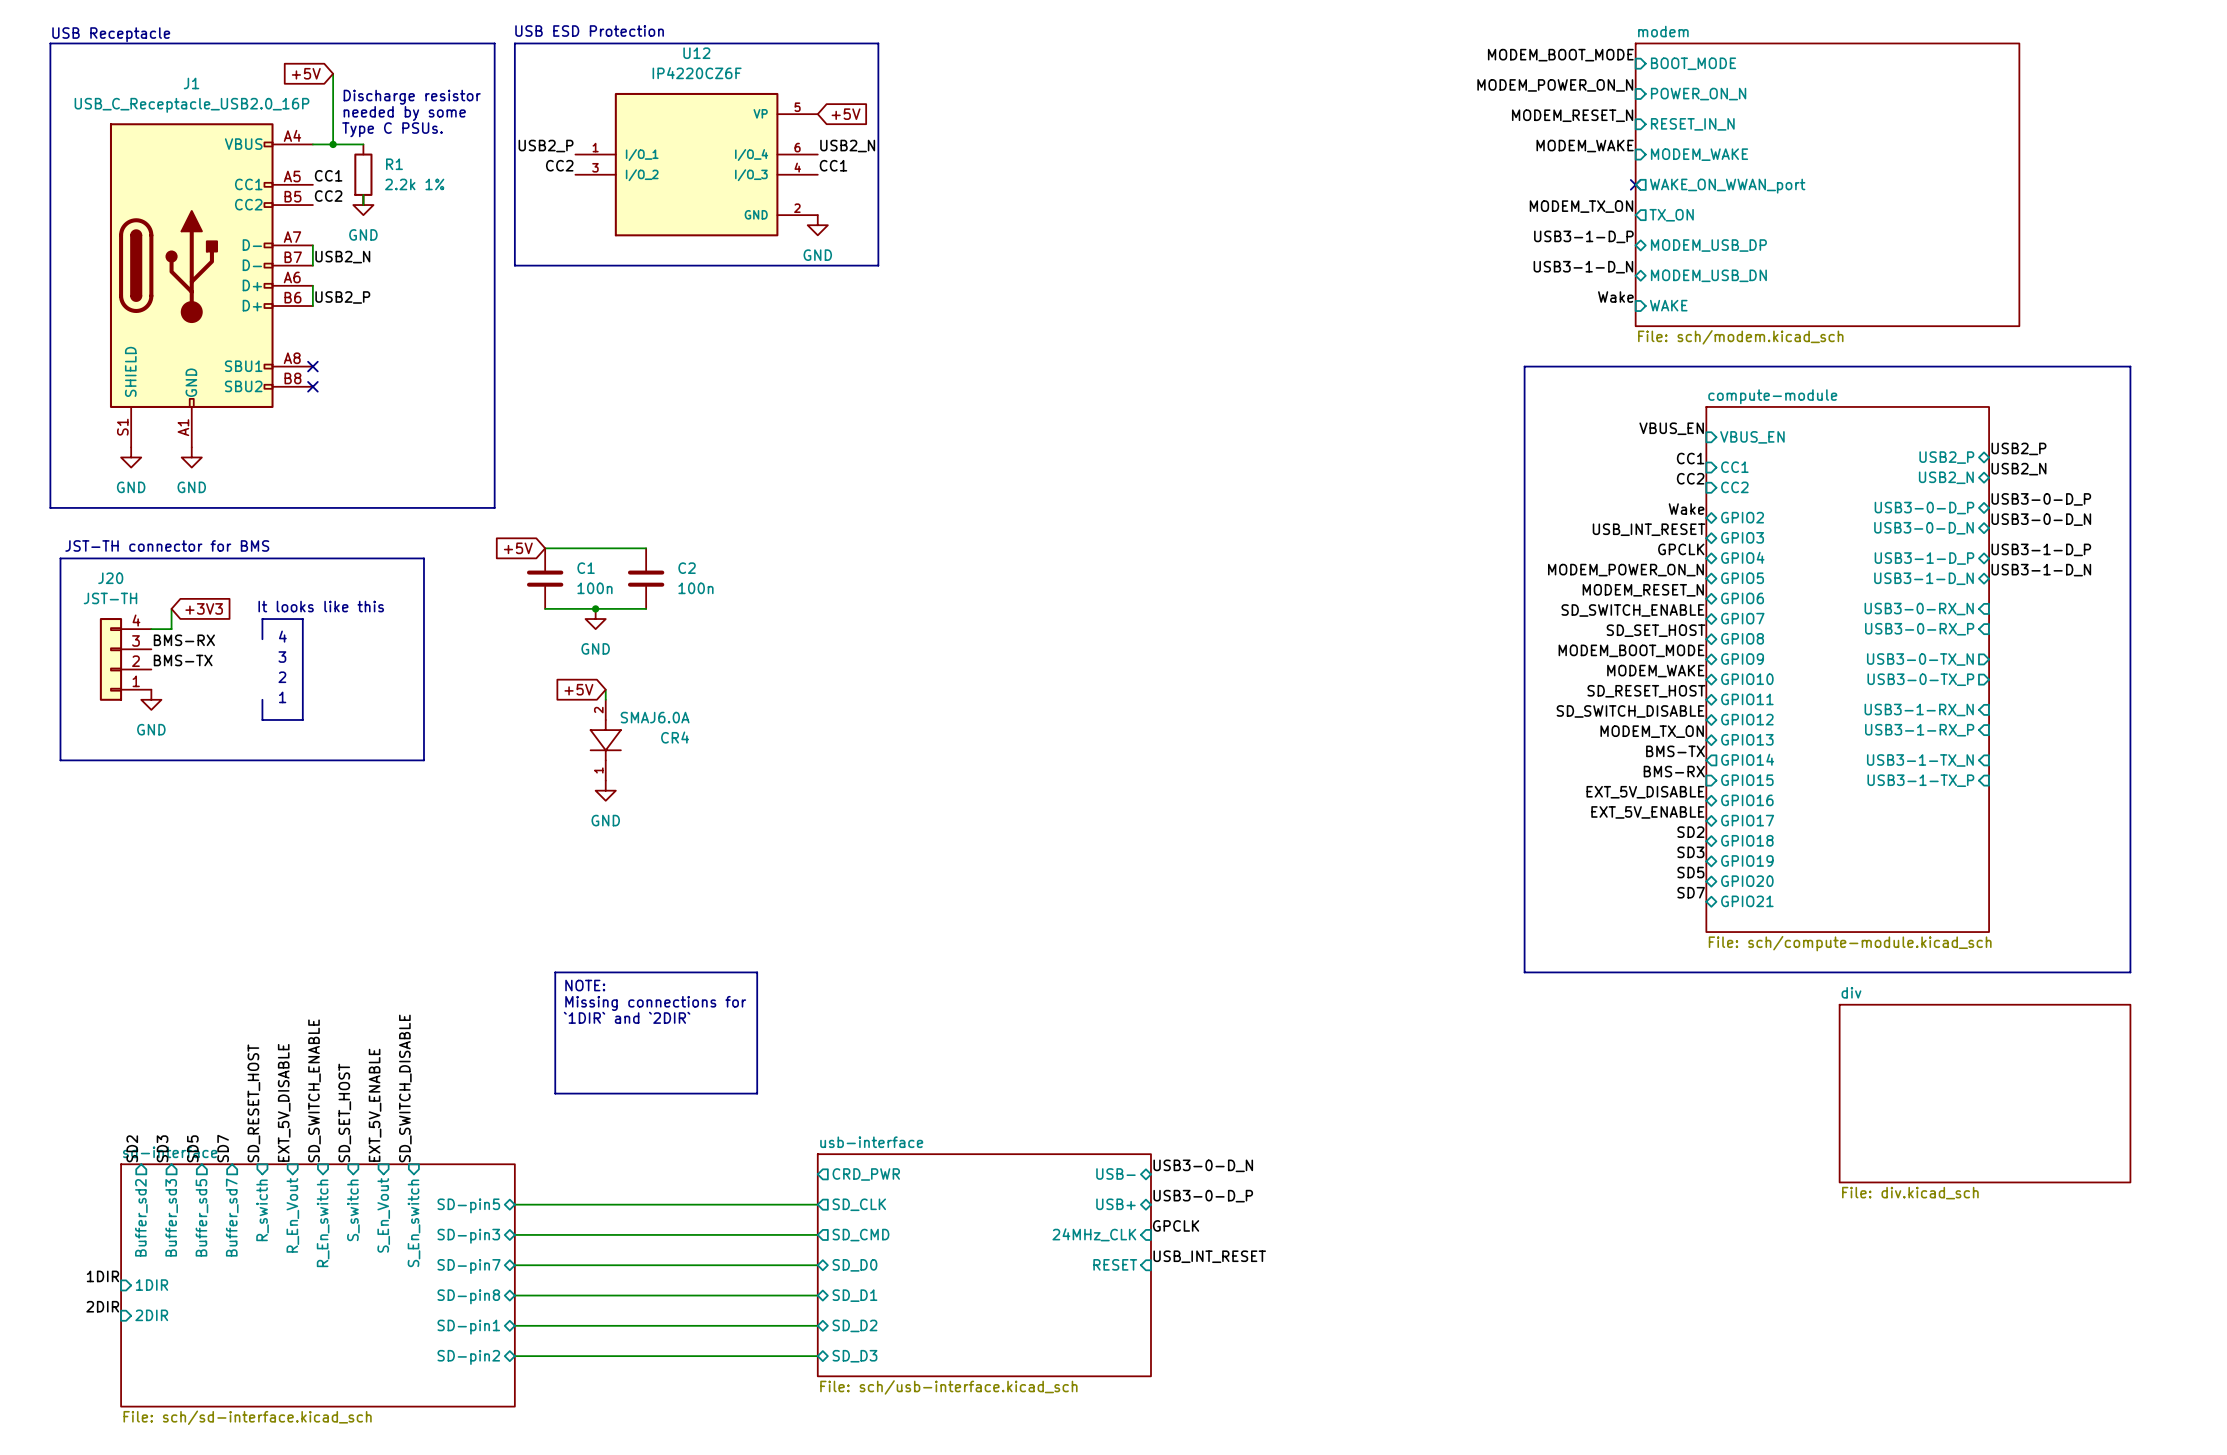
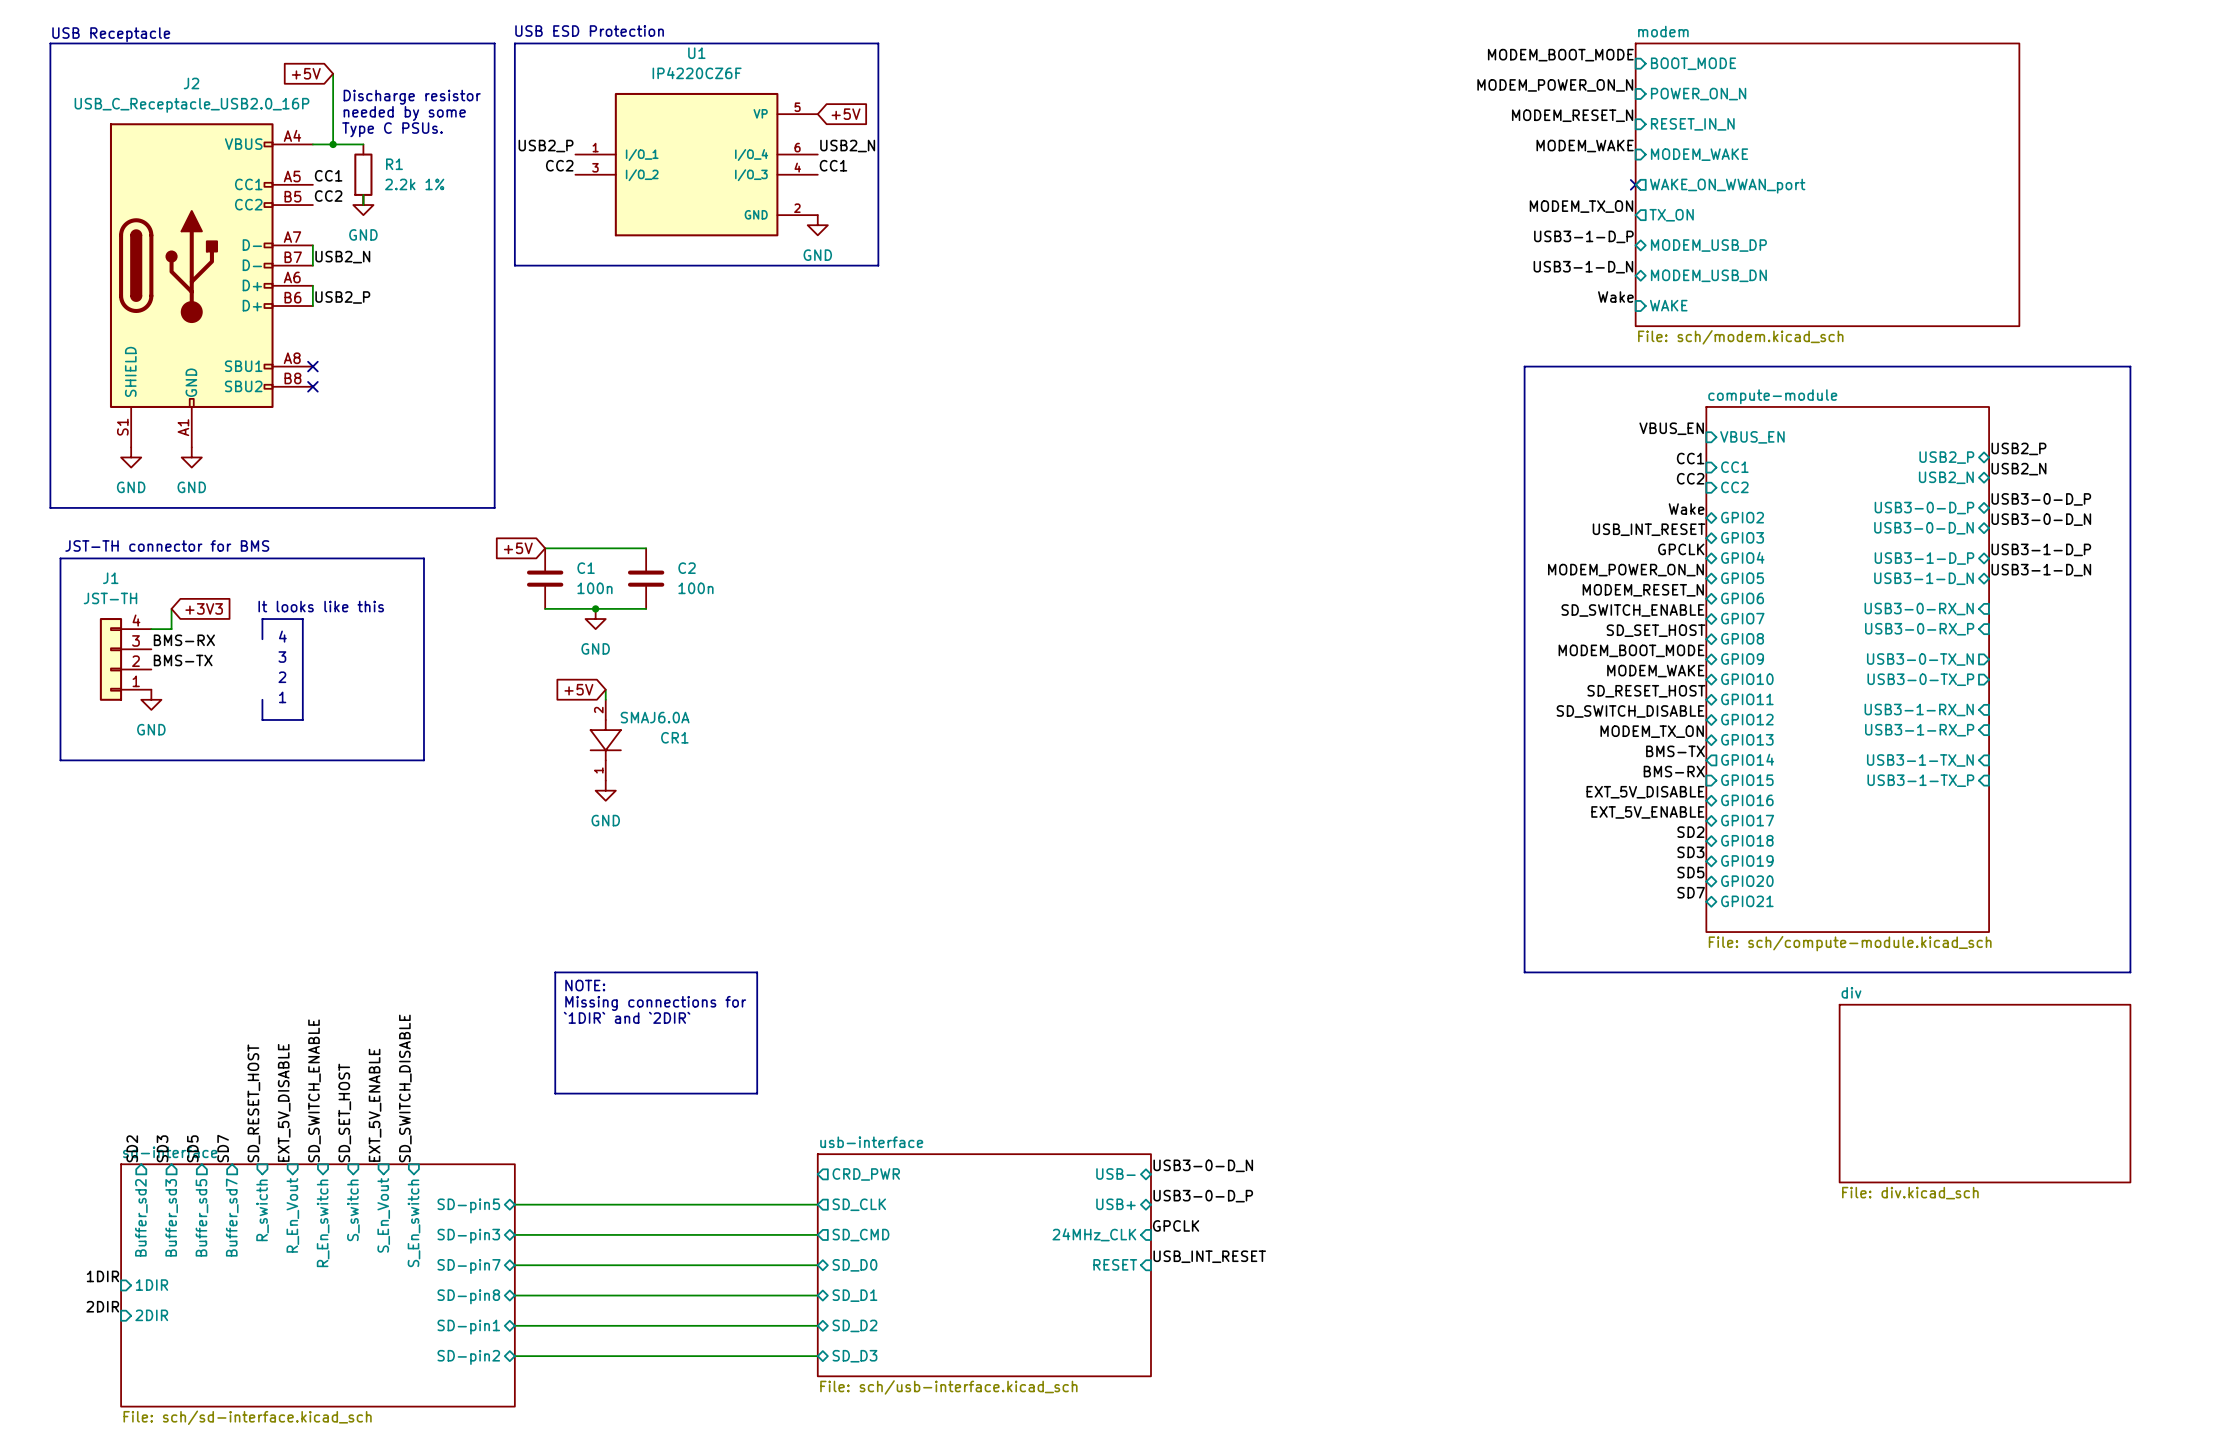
U12 name: U12 (696, 53) -> U1 (696, 53)
J1 name: J1 (191, 83) -> J2 (191, 83)
J20 name: J20 (110, 578) -> J1 (110, 578)
CR4 name: CR4 (675, 737) -> CR1 (674, 737)

